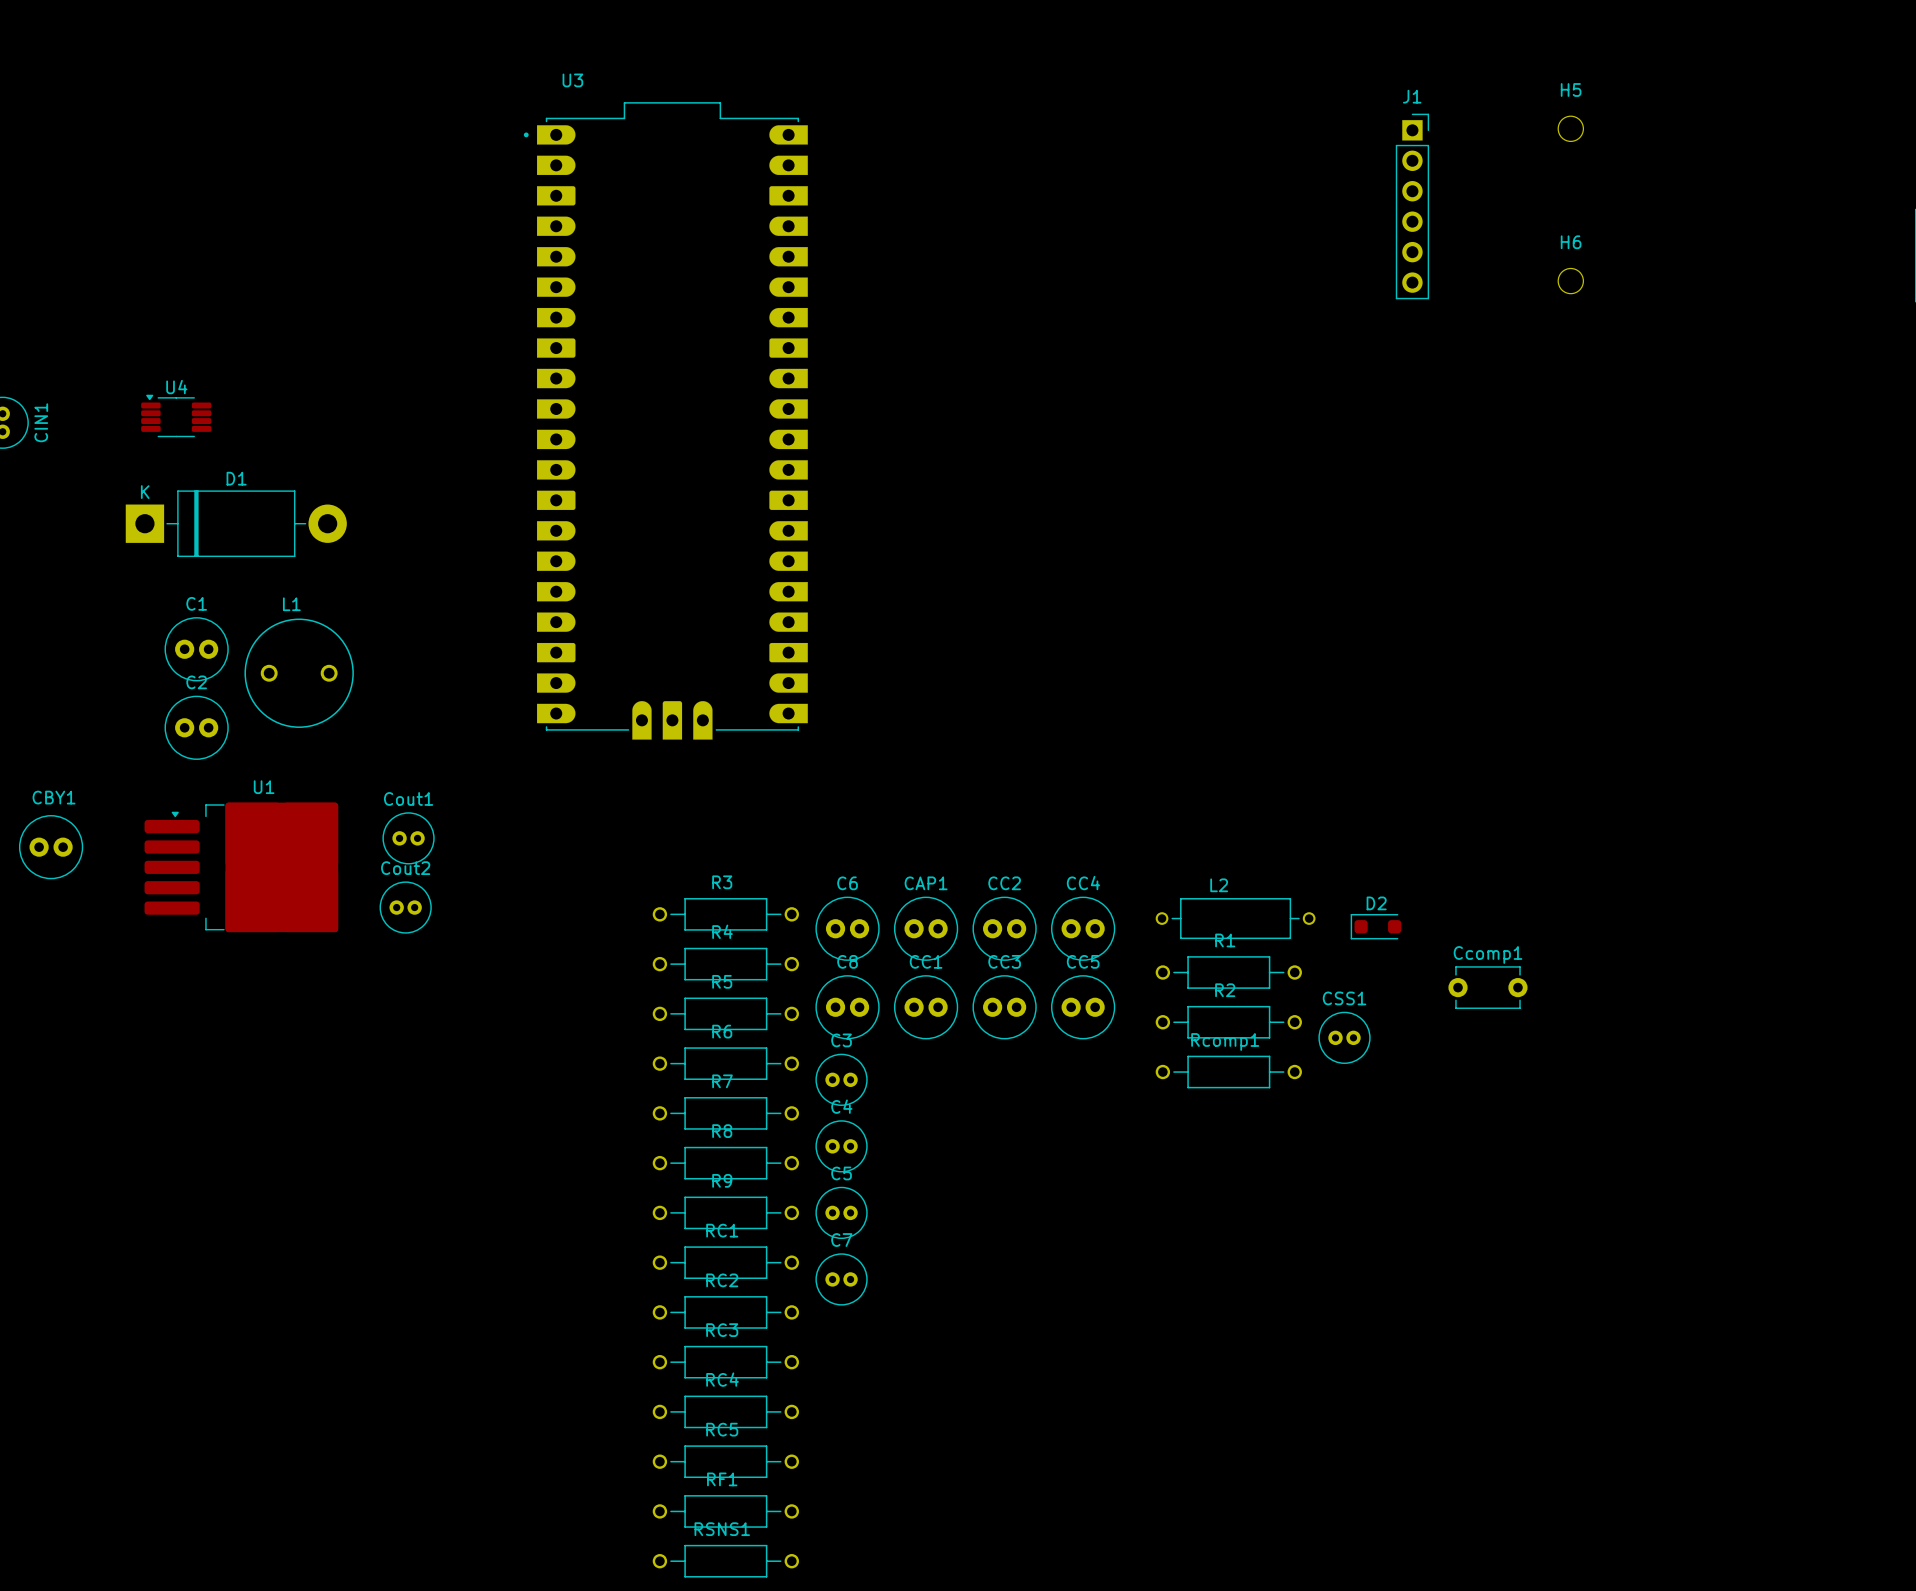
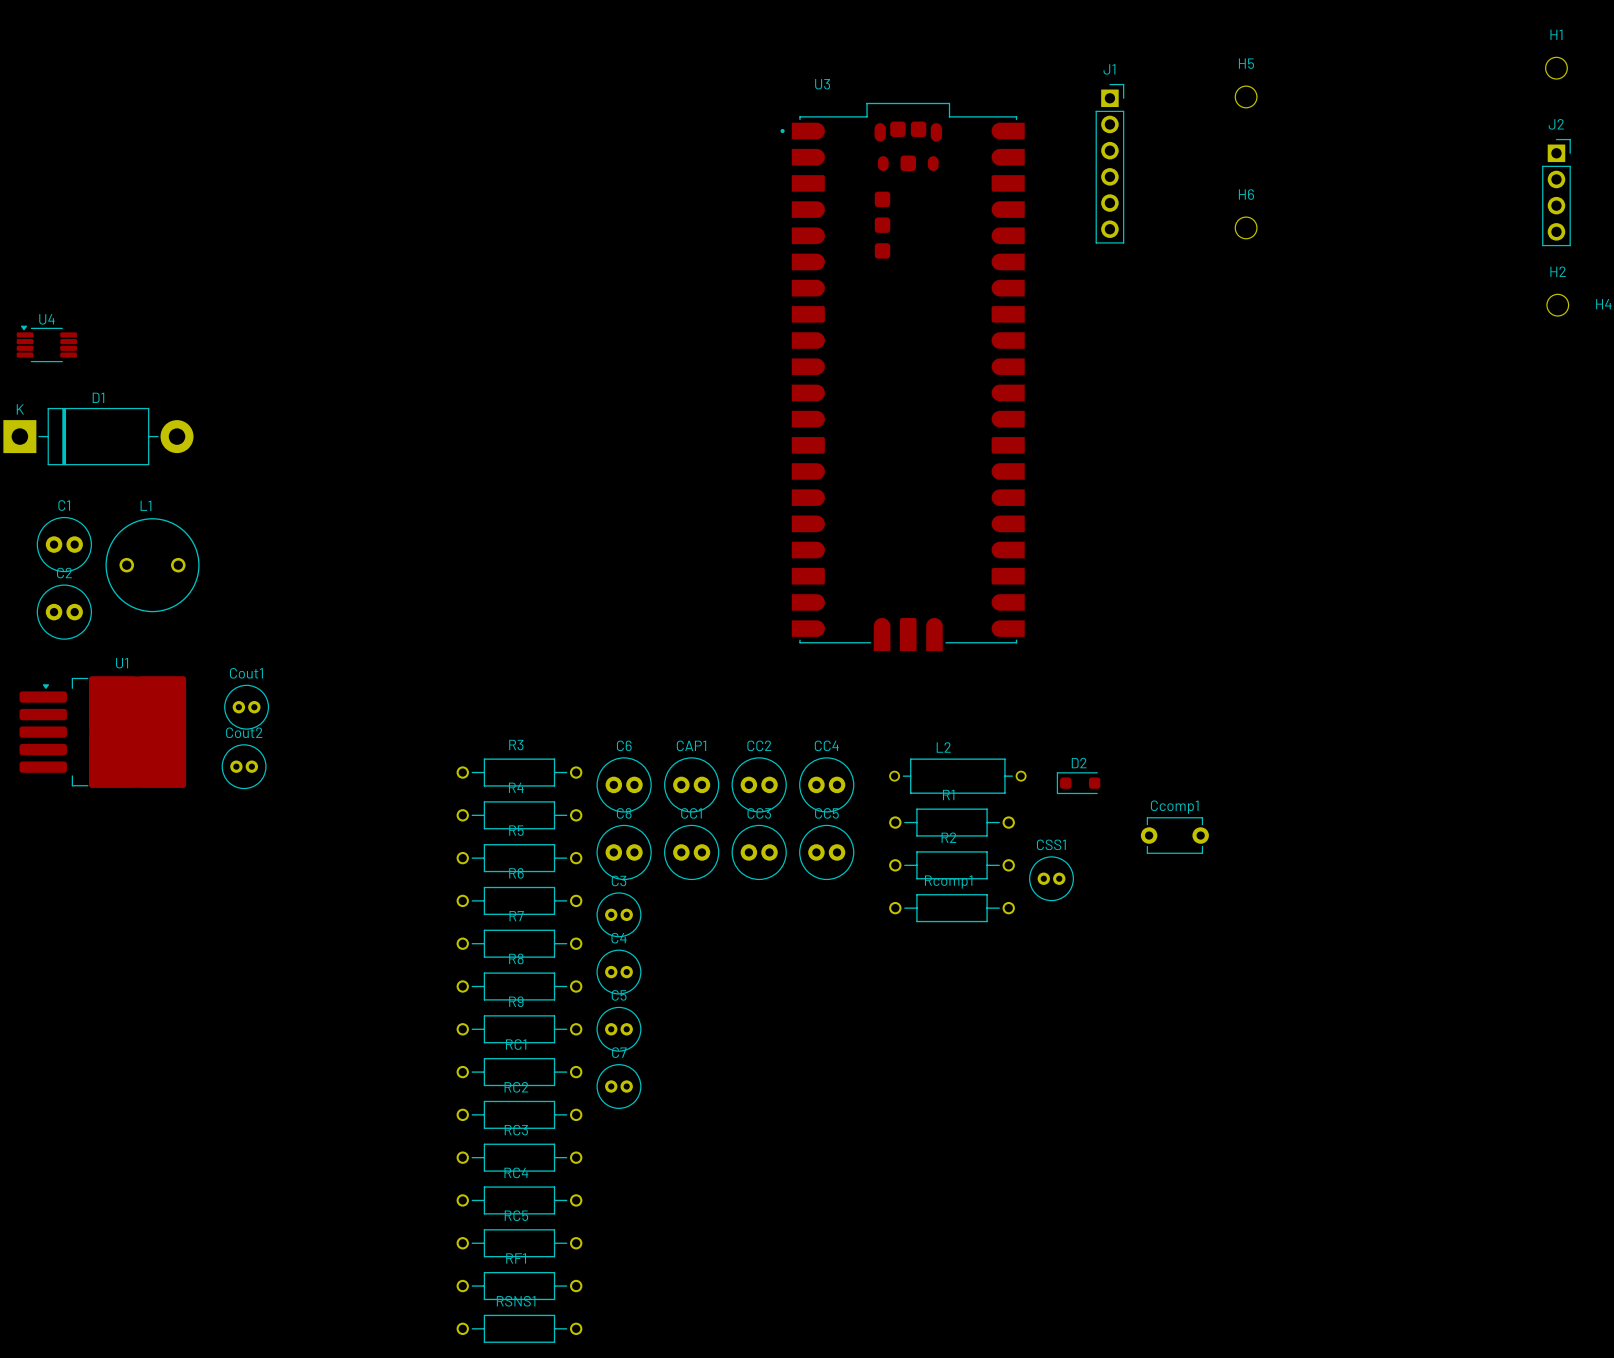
U3 footprint: [523, 102, 808, 740] -> [780, 102, 1025, 652]

